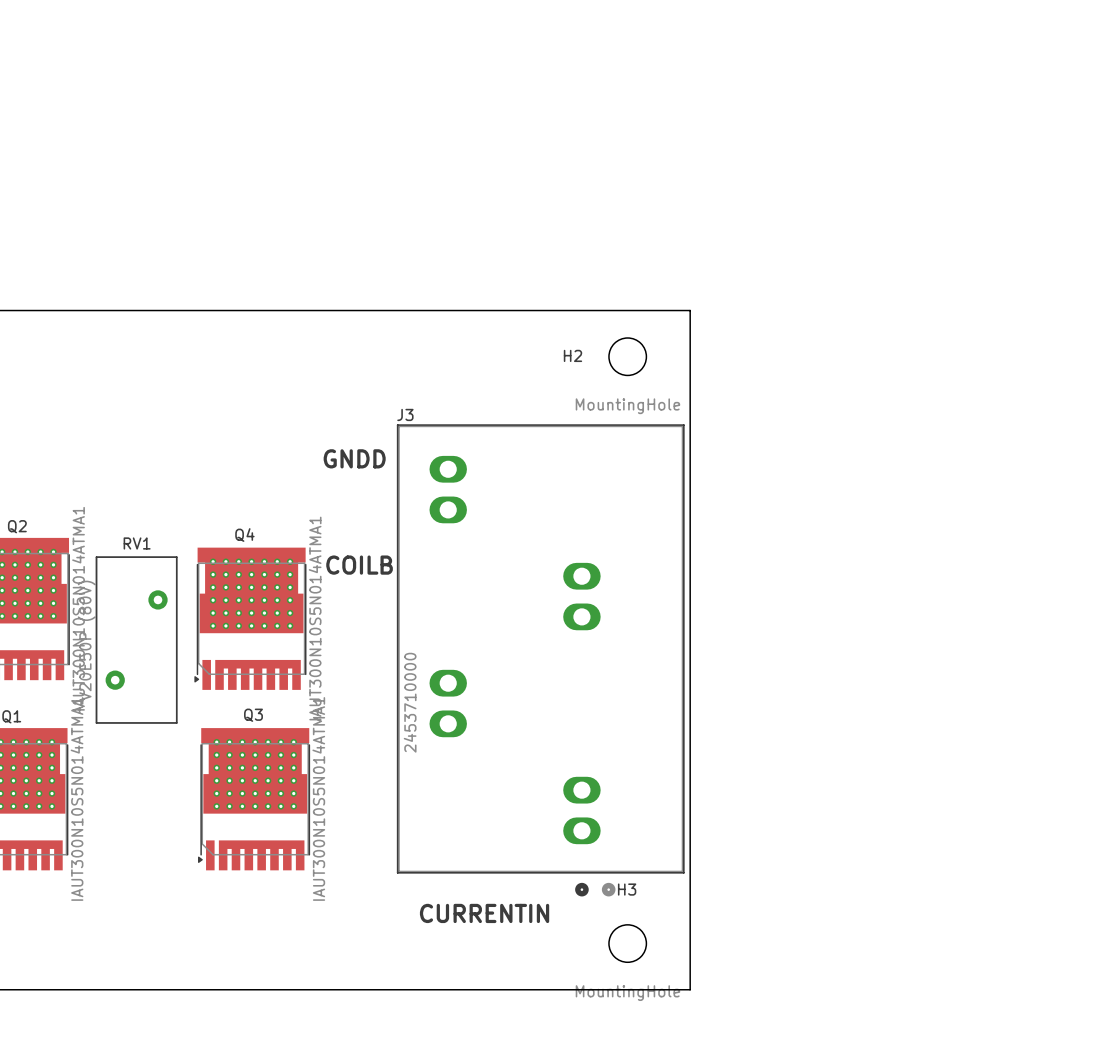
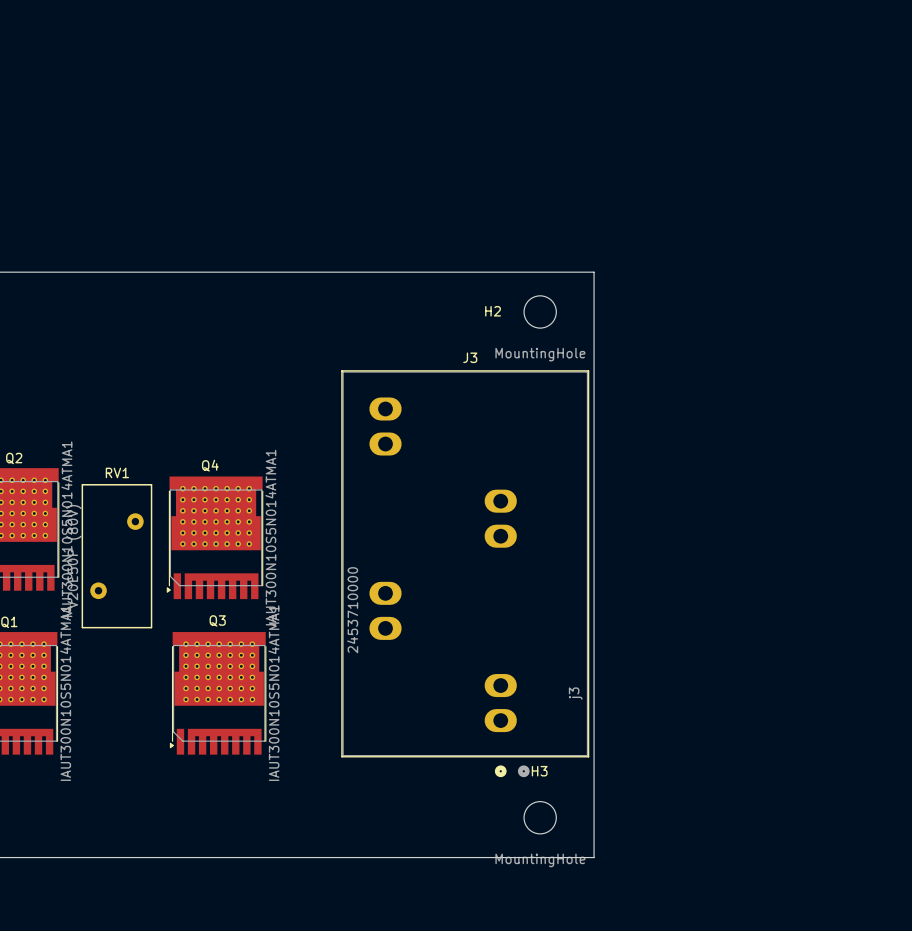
J3 name position: J3 (405, 414) -> J3 (470, 357)
text: GNDD (354, 458) -> none
text: COILB (359, 565) -> none
text: none -> j3 (575, 693)
text: CURRENTIN (484, 913) -> none

